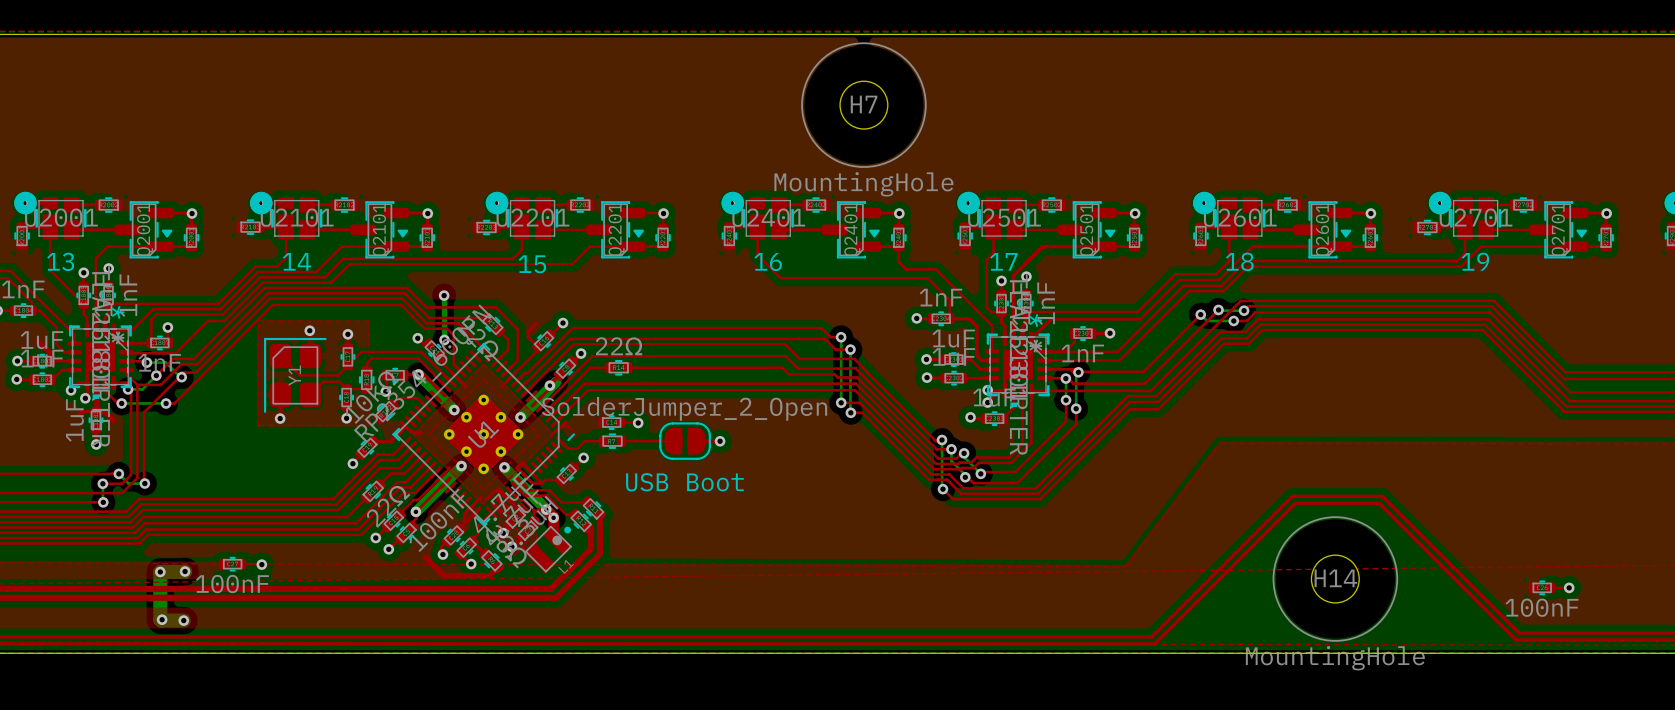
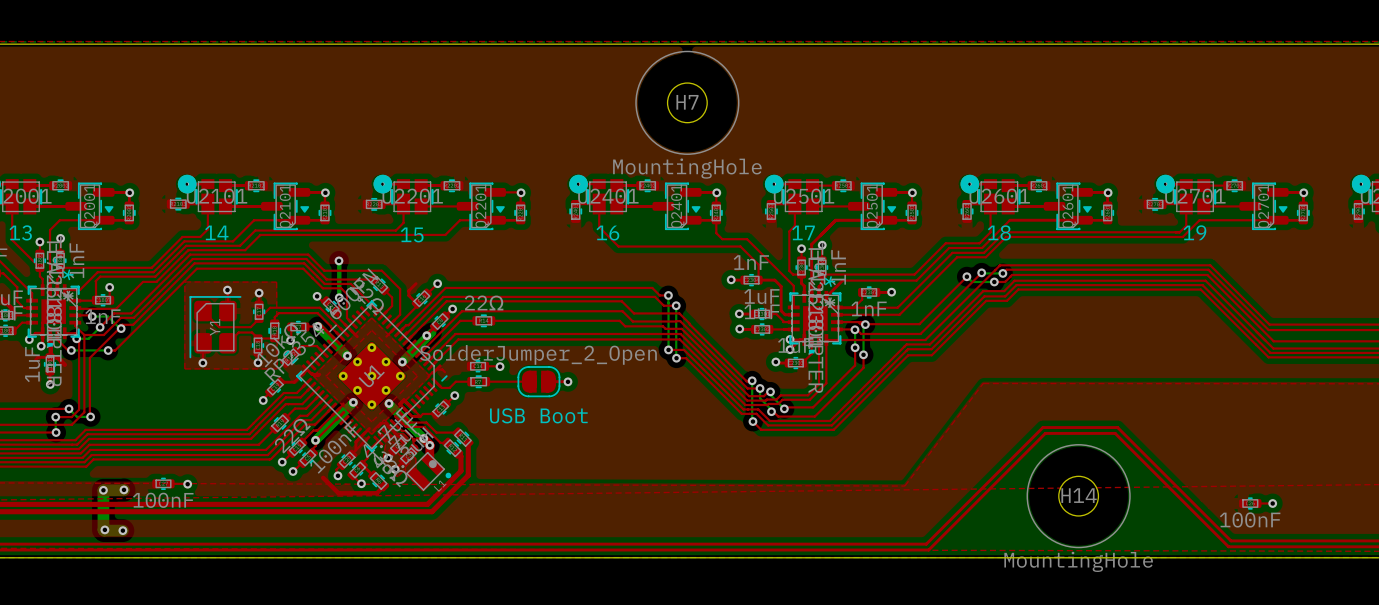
L1 footprint: [524, 525, 573, 573] -> [405, 451, 452, 492]

